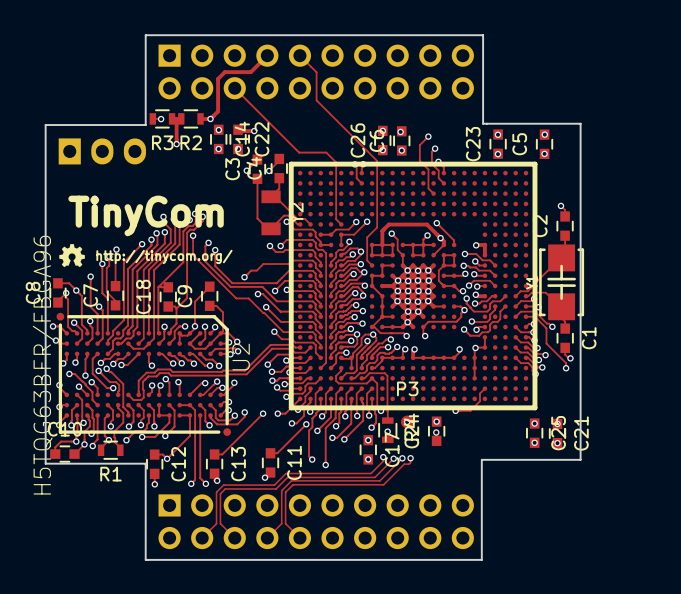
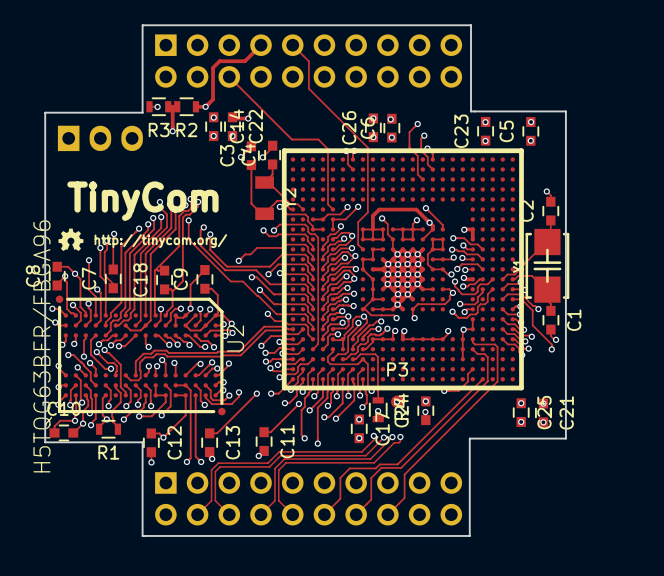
track: none -> (472, 339) (474, 344) (495, 344) (497, 346) (497, 381) (404, 474) (404, 497) (387, 514)
track: none -> (472, 349) (477, 354) (484, 354) (487, 357) (487, 381) (401, 467) (381, 467) (371, 478) (371, 499) (356, 514)
track: none -> (482, 379) (397, 464) (379, 464) (375, 468) (349, 468) (340, 477) (340, 498) (324, 514)

